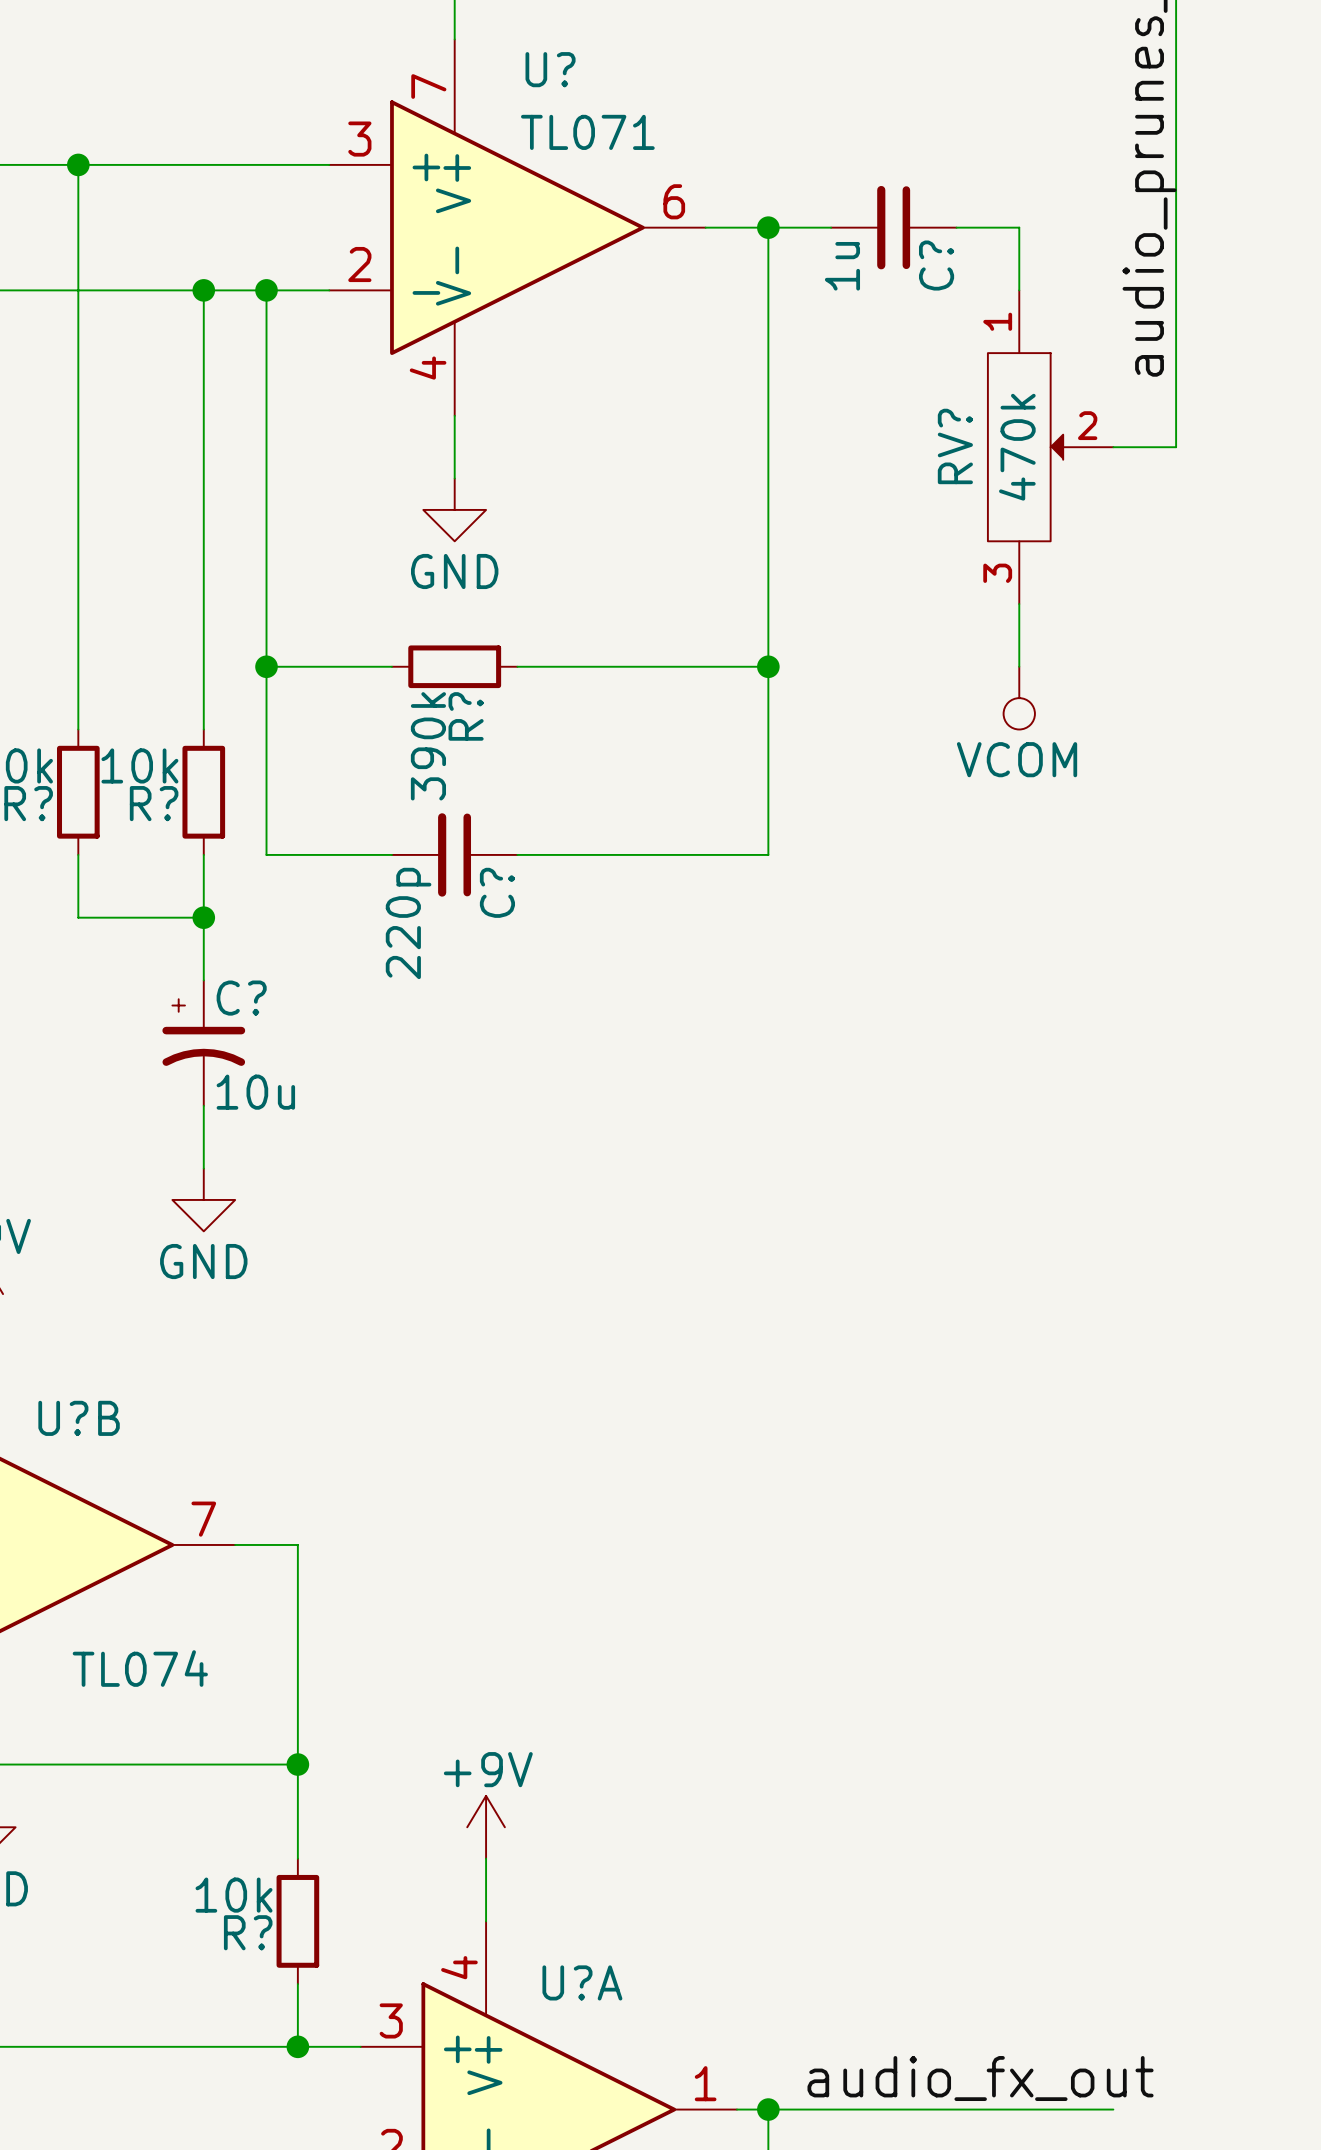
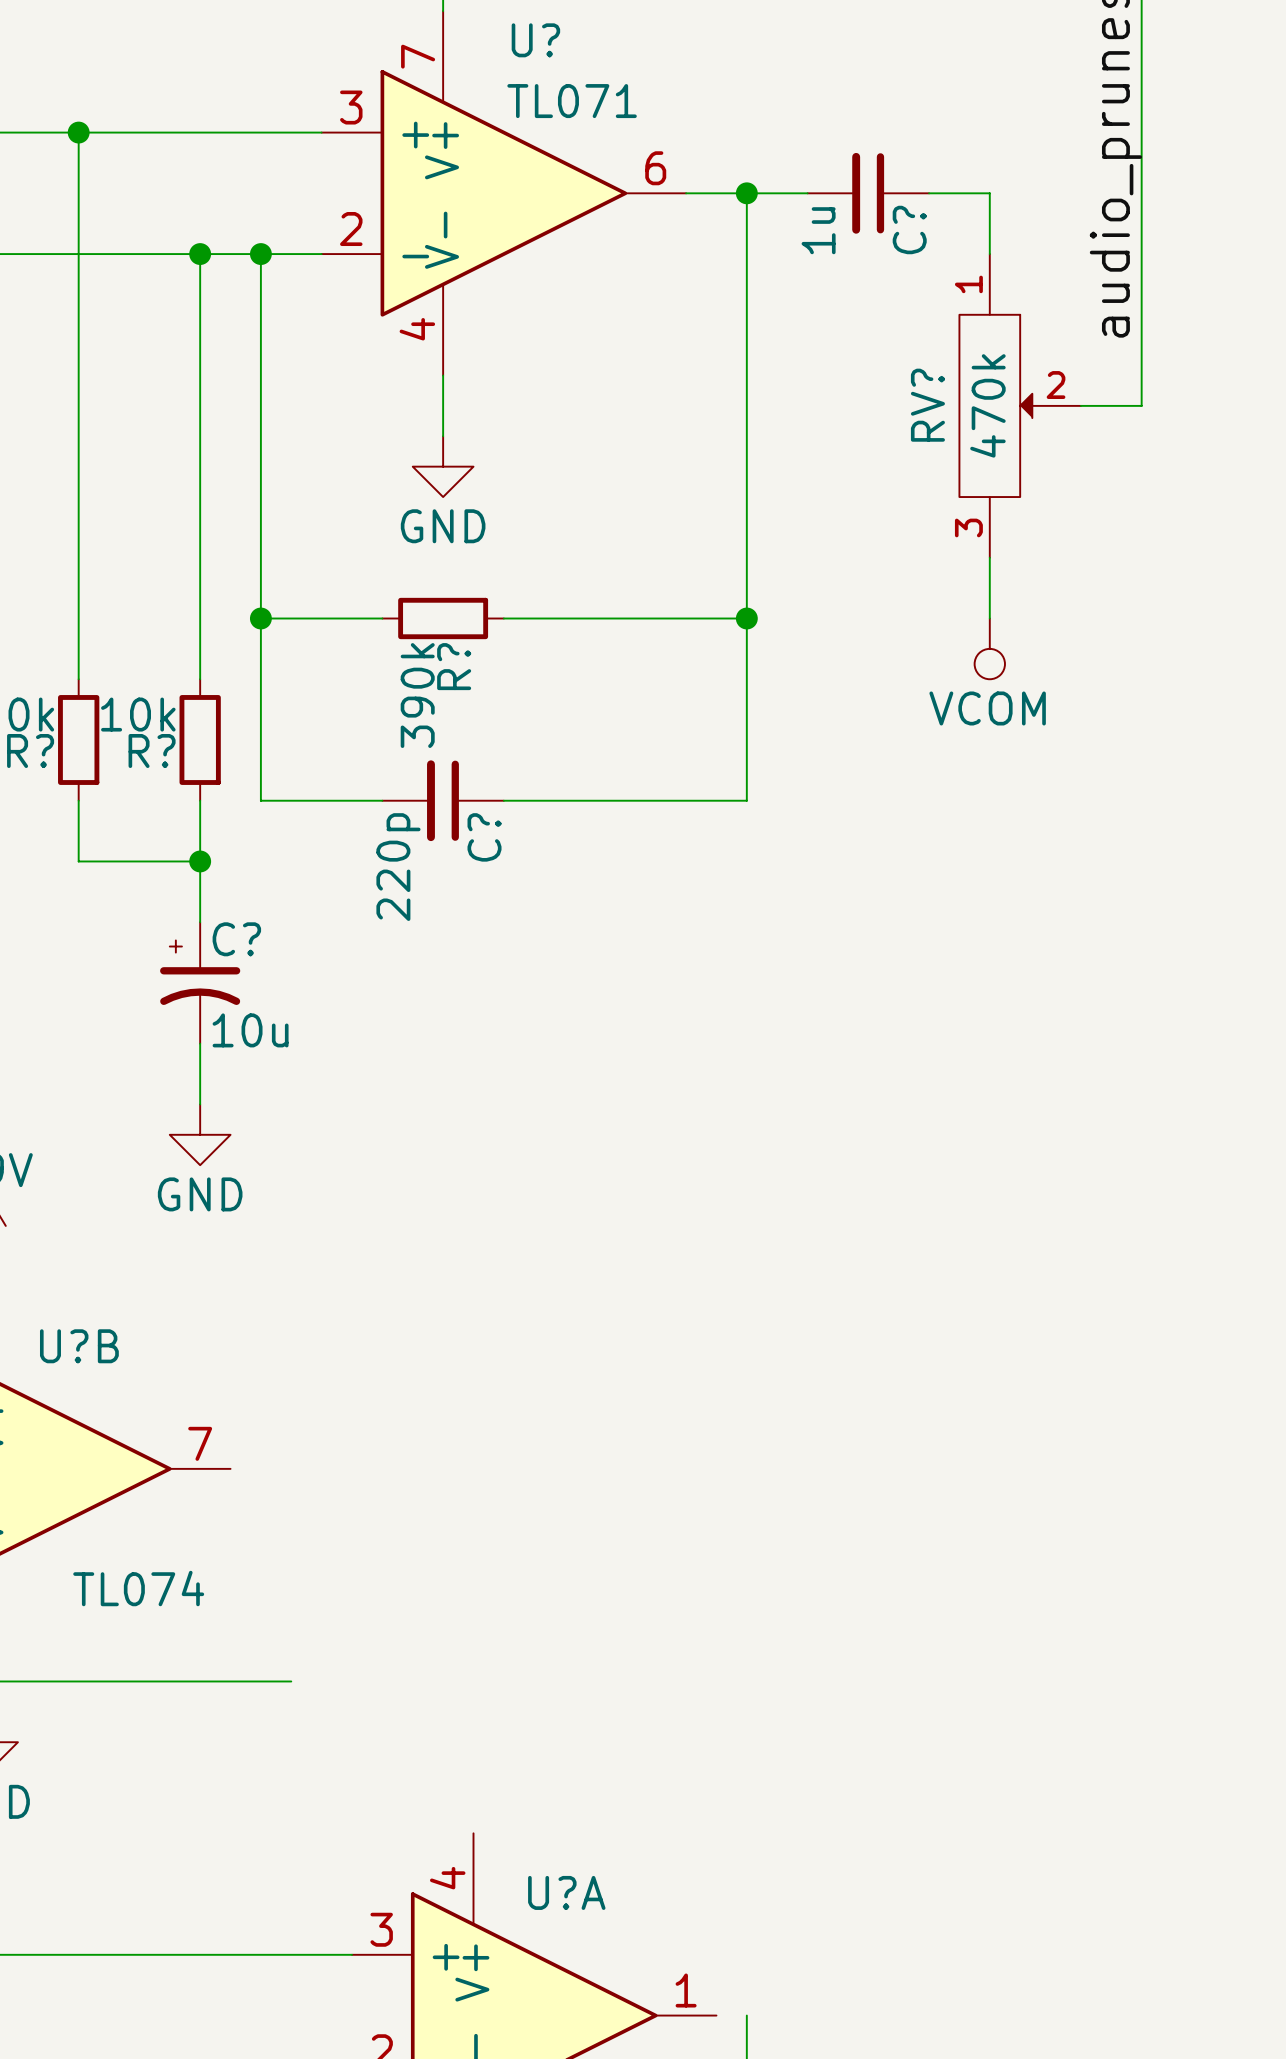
wire: (235, 1544) (297, 1544) (297, 1858) -> none
junction: (297, 1764) -> none
power symbol: +9V (486, 1827) -> none
wire: (486, 1858) (486, 1921) -> none
R?: 10k (297, 1921) -> none
wire: (297, 1984) (297, 2046) -> none
junction: (297, 2046) -> none
label: audio_fx_out (980, 2078) -> none
wire: (736, 2109) (1113, 2109) -> none
junction: (768, 2109) -> none

